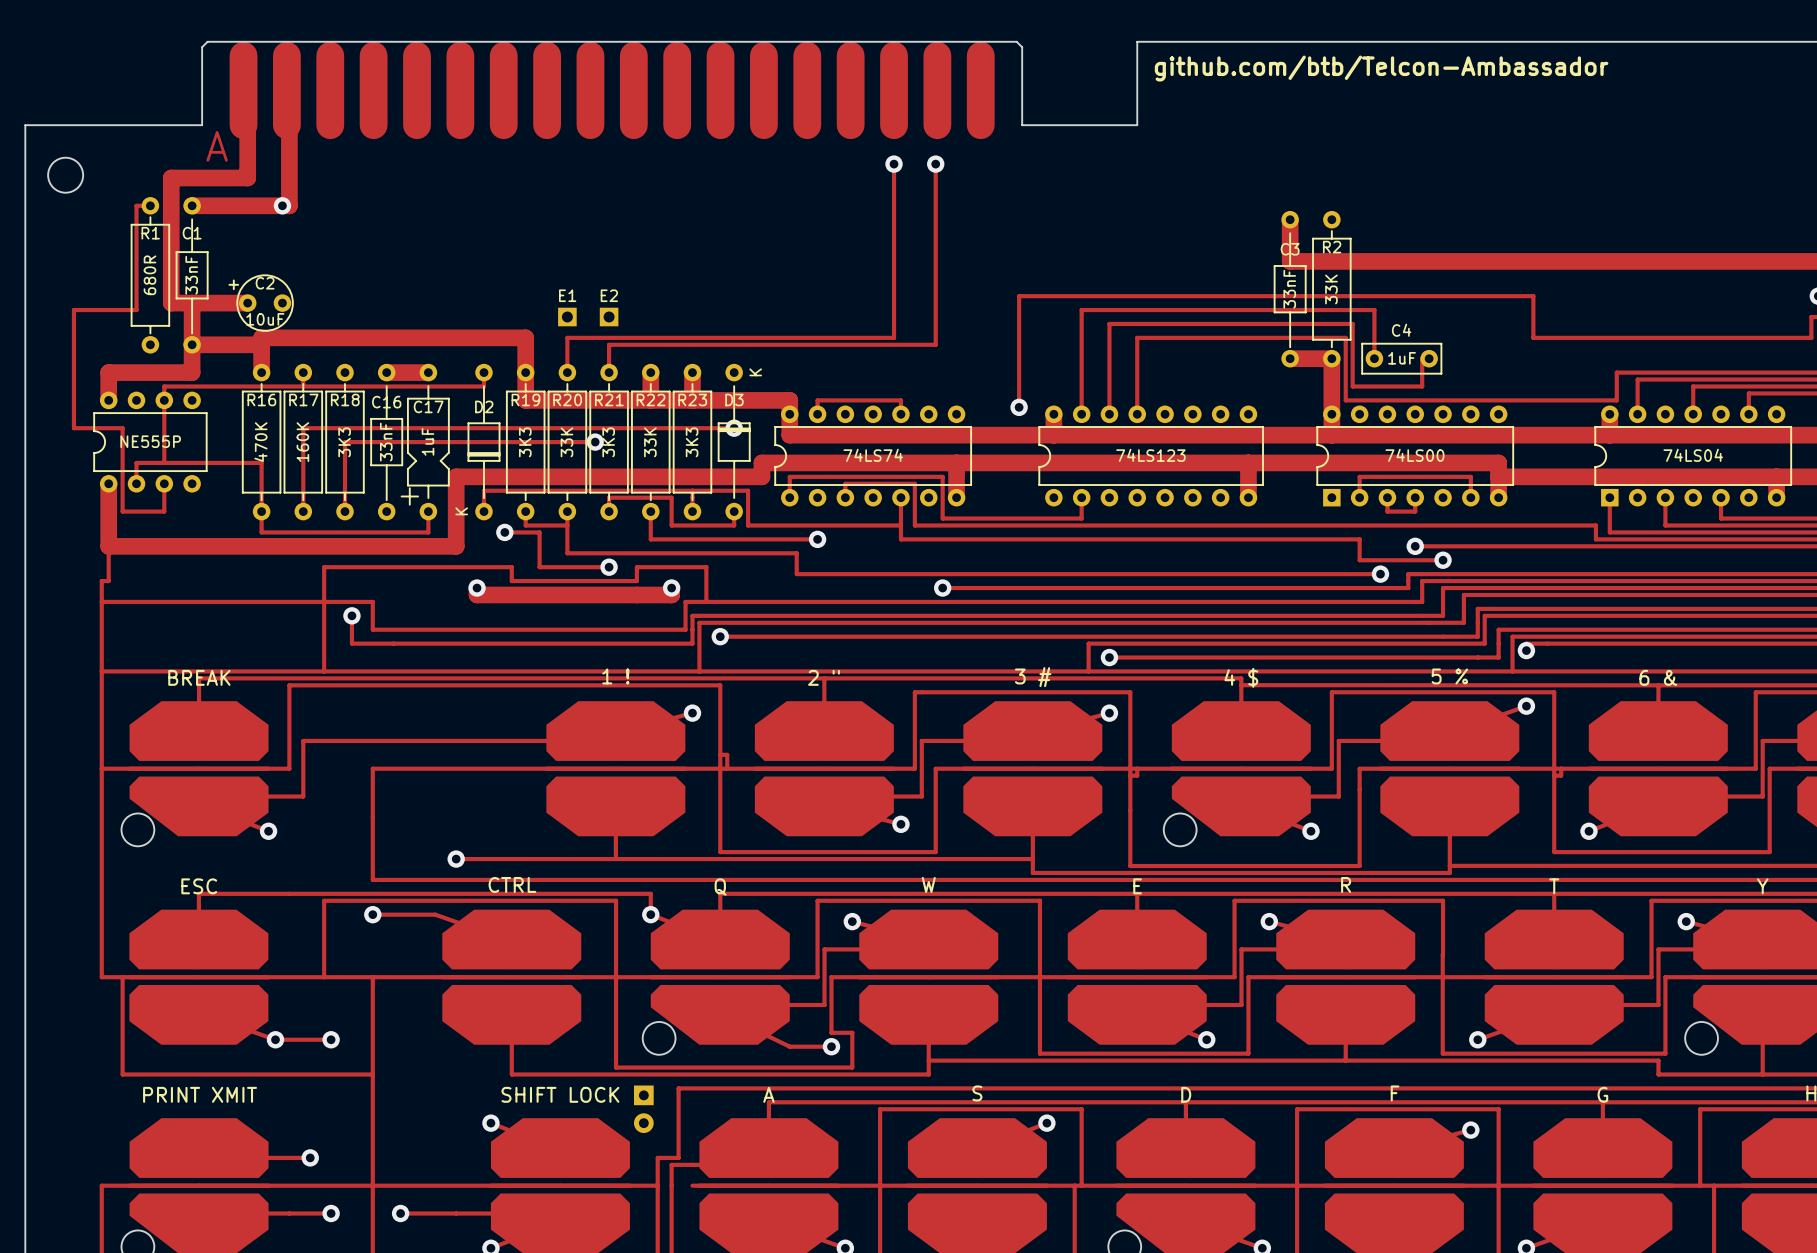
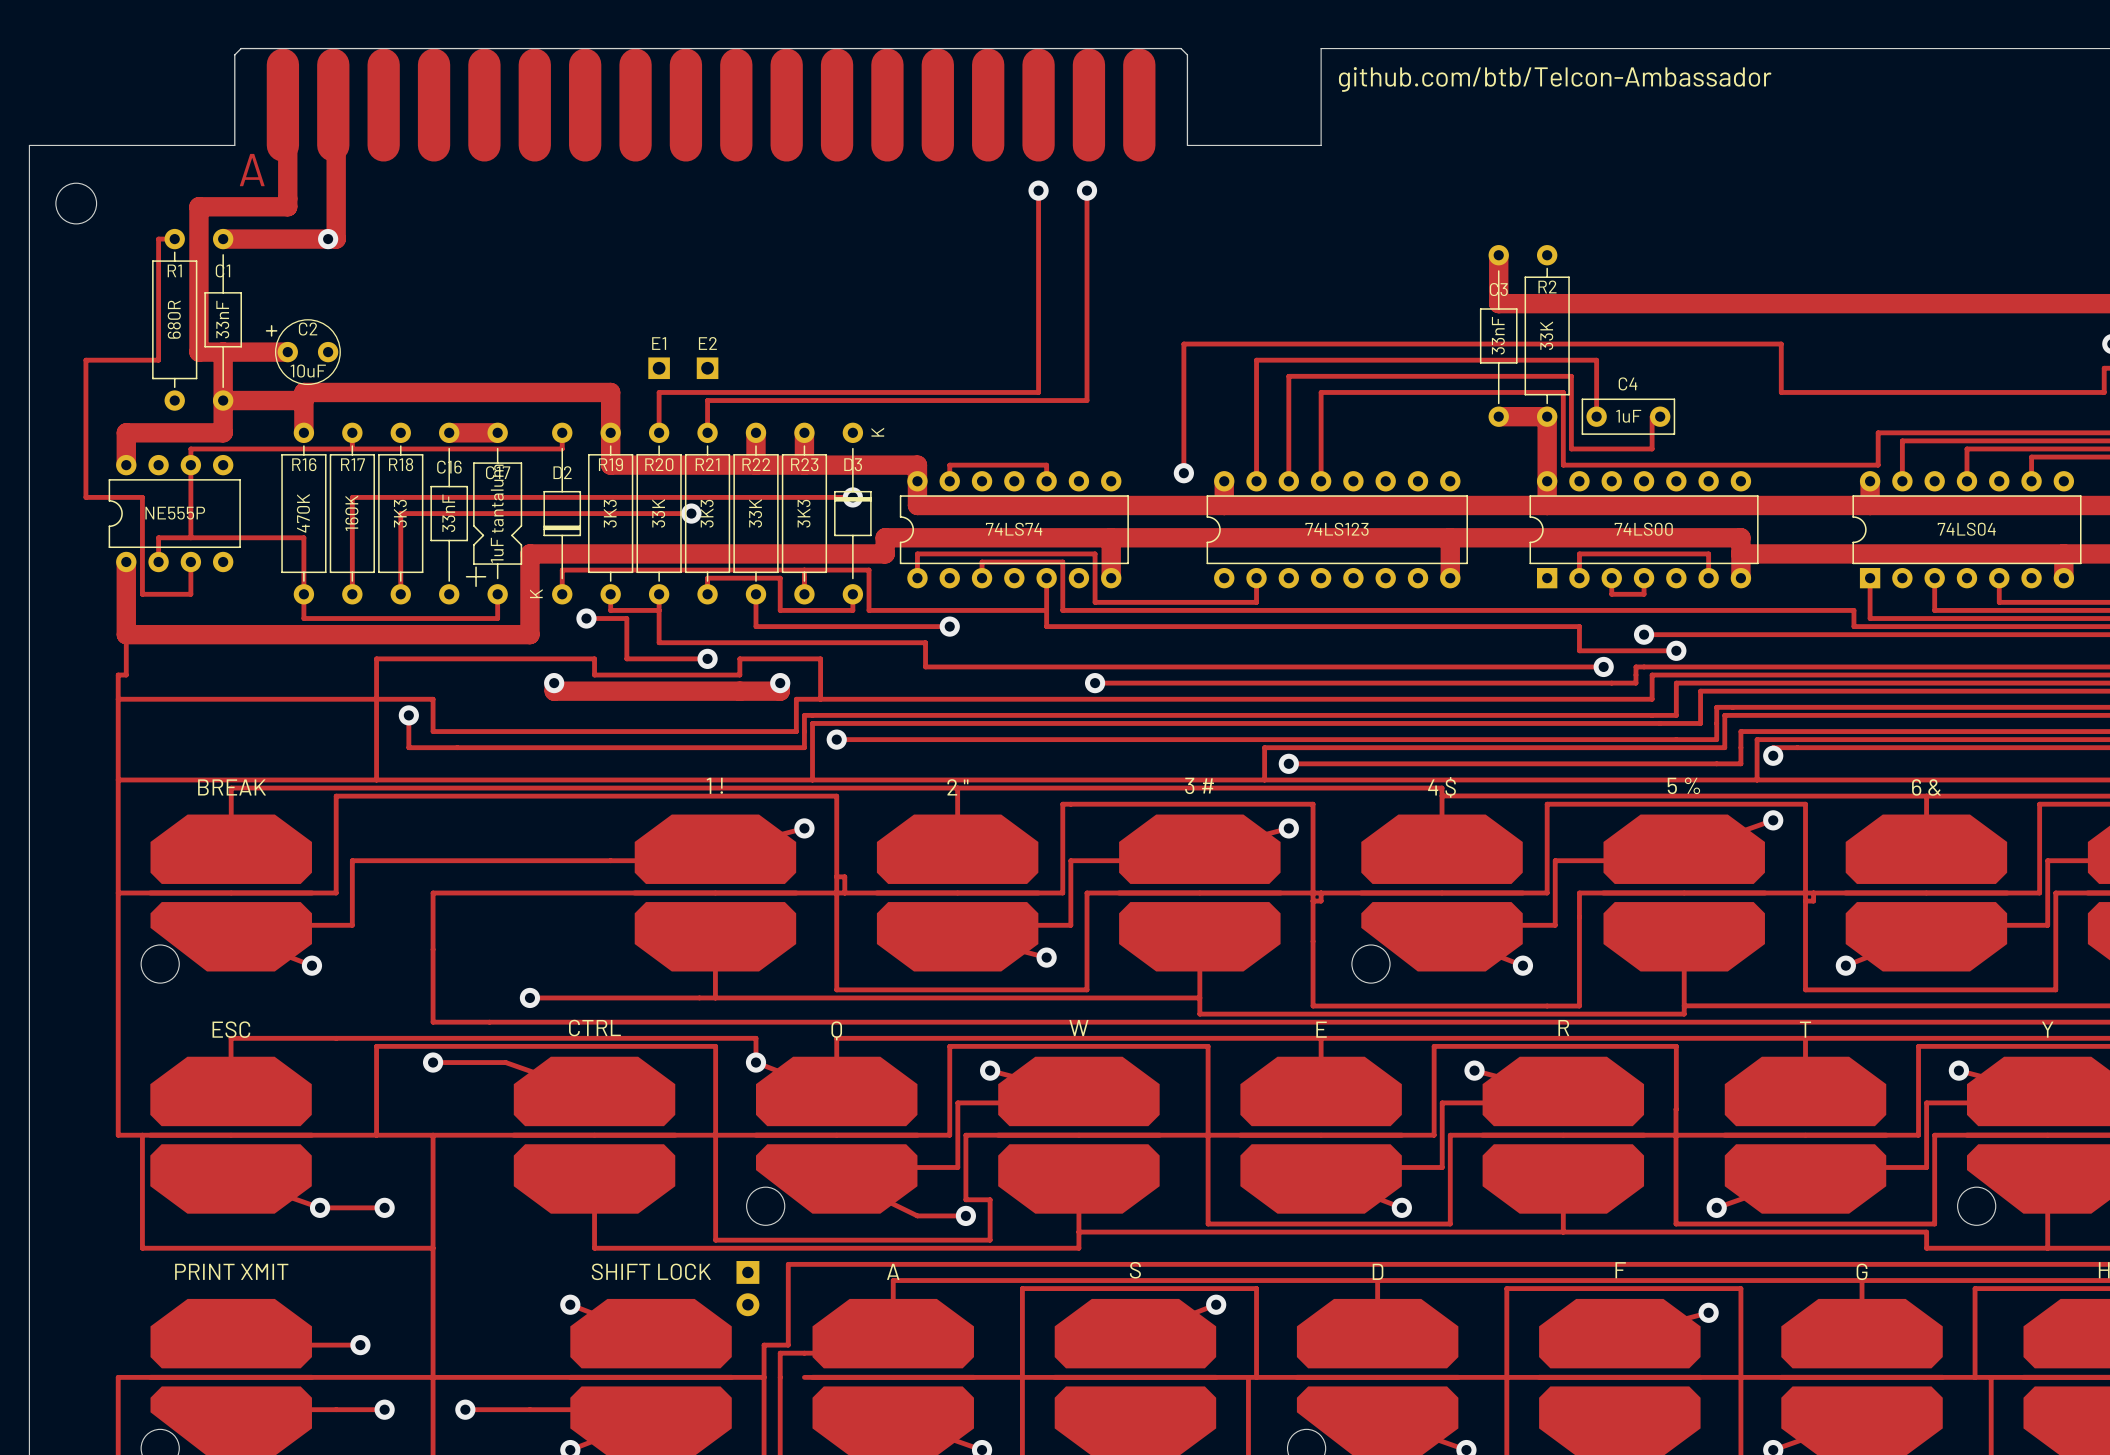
C17 value: 1uF (427, 441) -> 1uF tantalum (497, 513)

